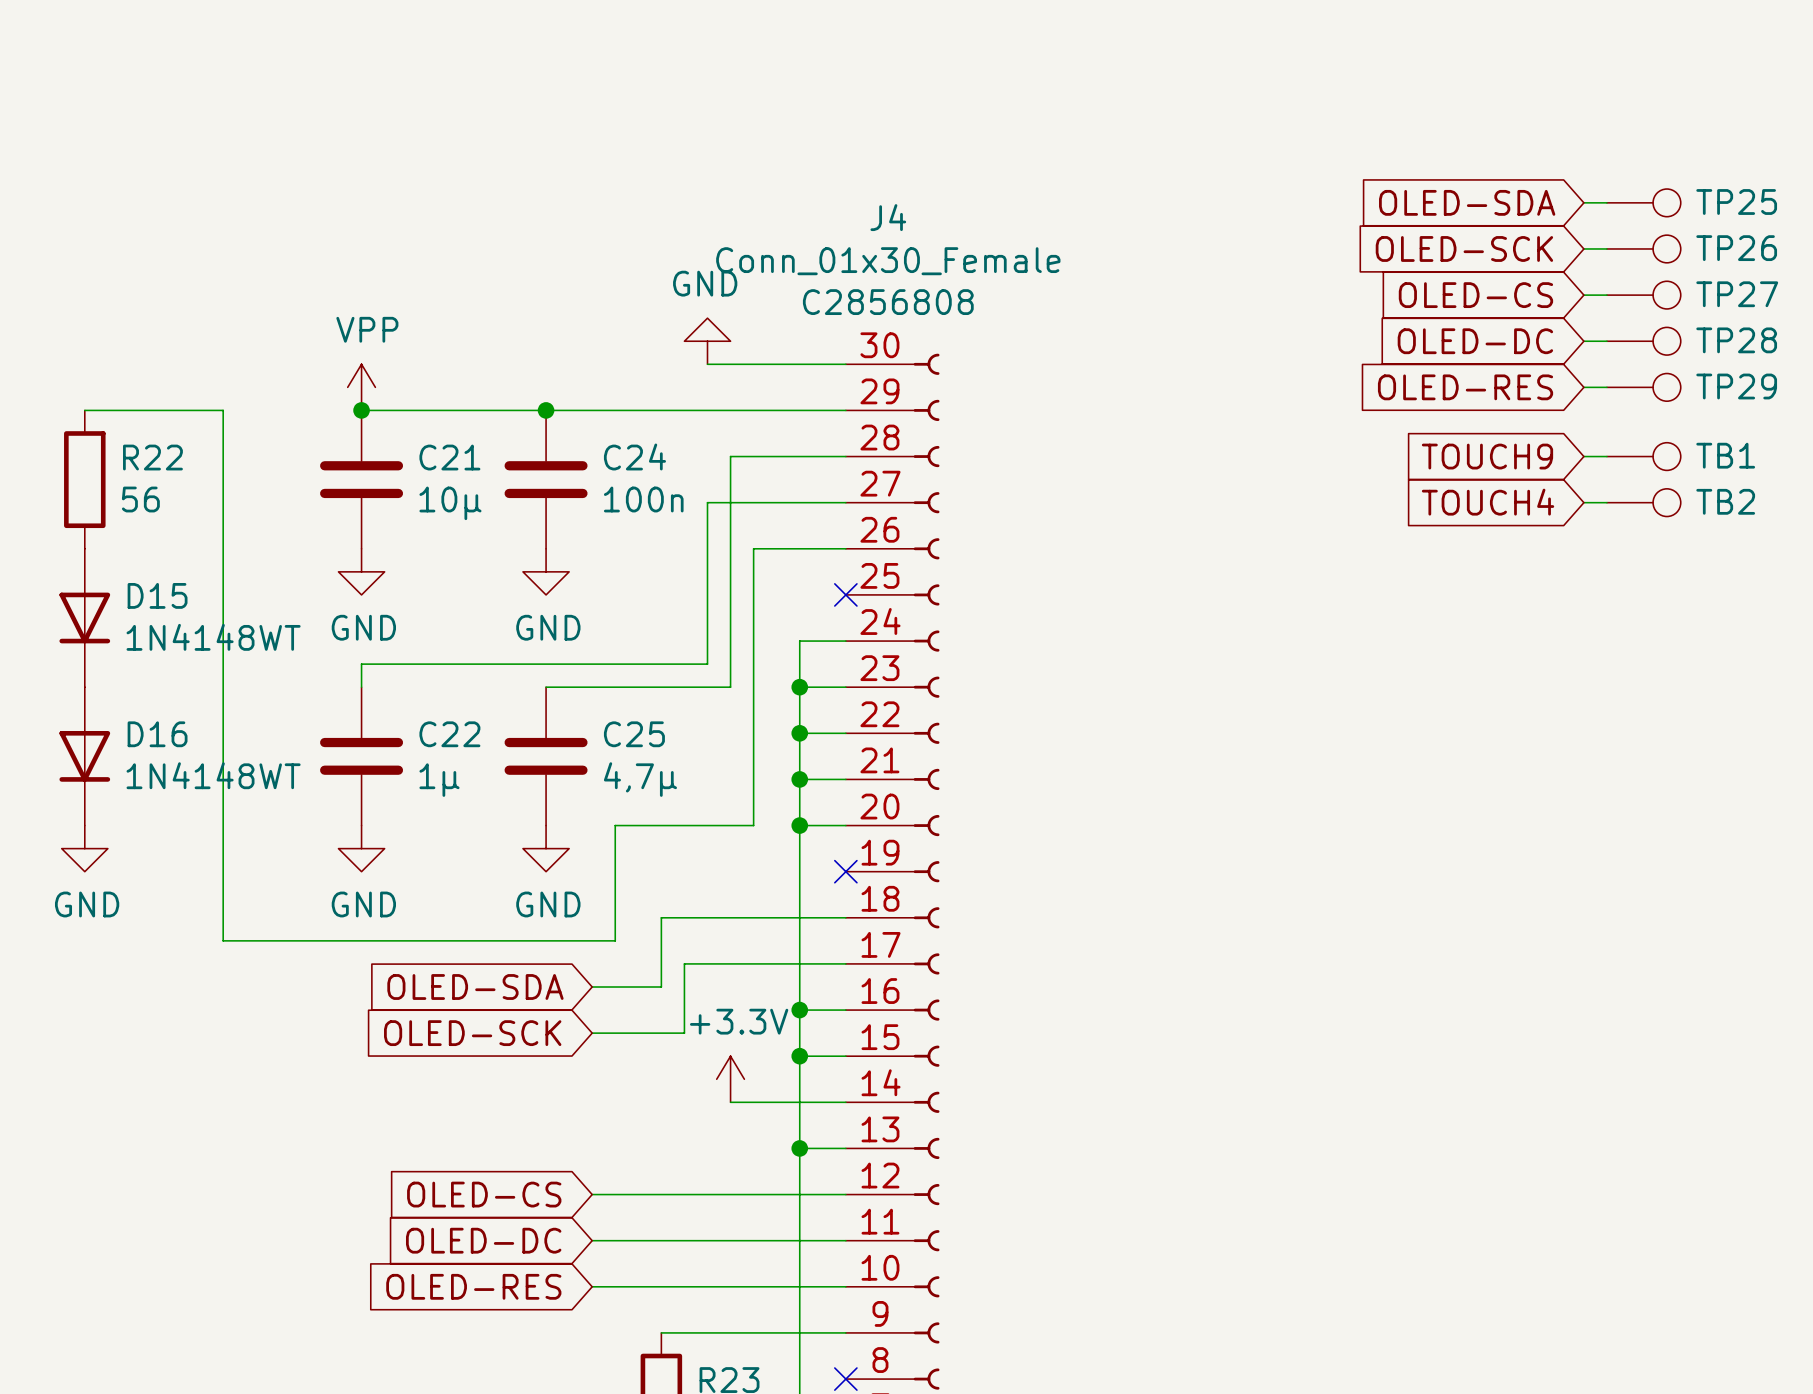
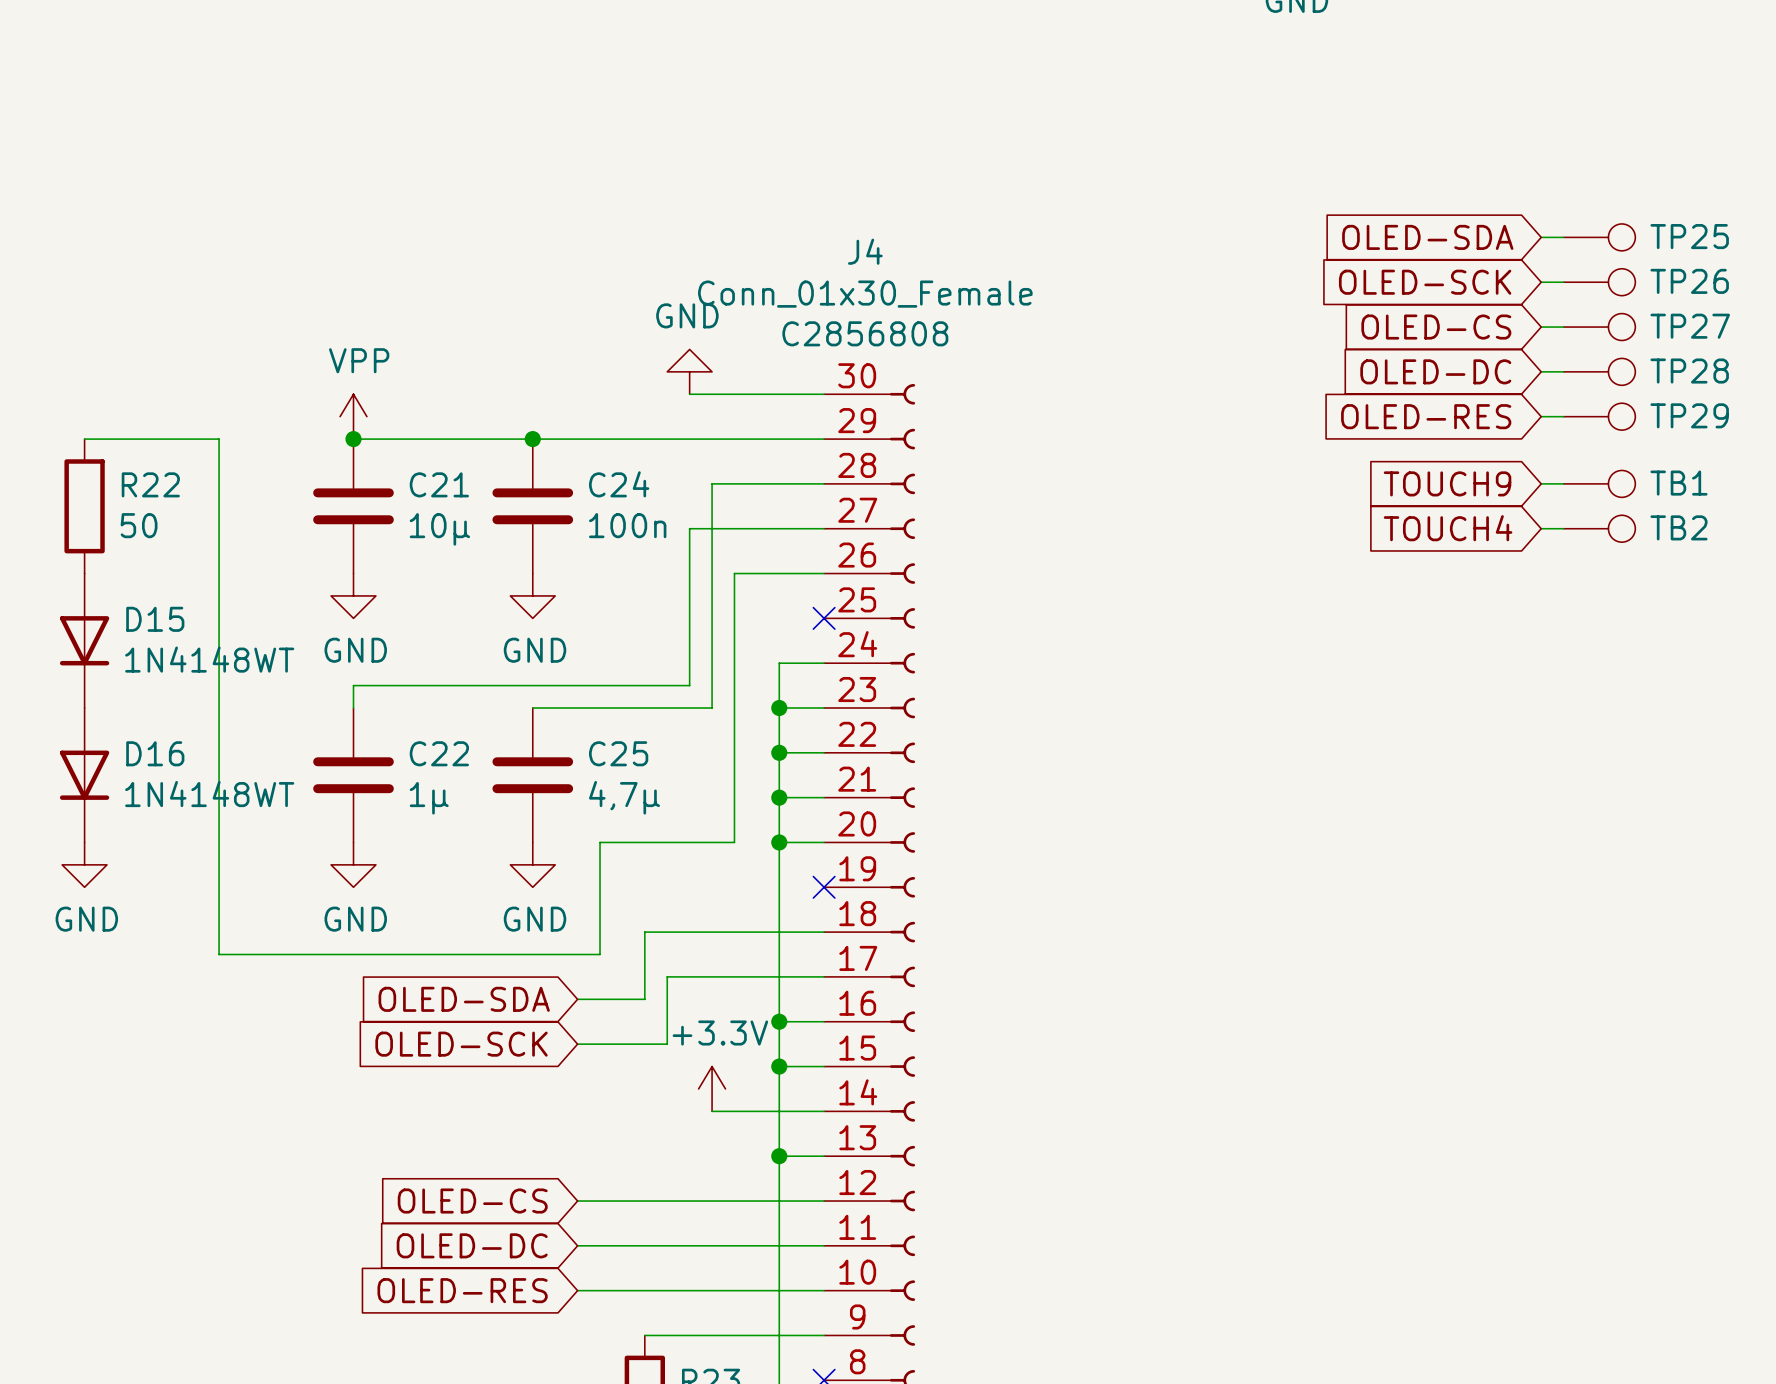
R22 value: 56 (140, 499) -> 50 (139, 525)

